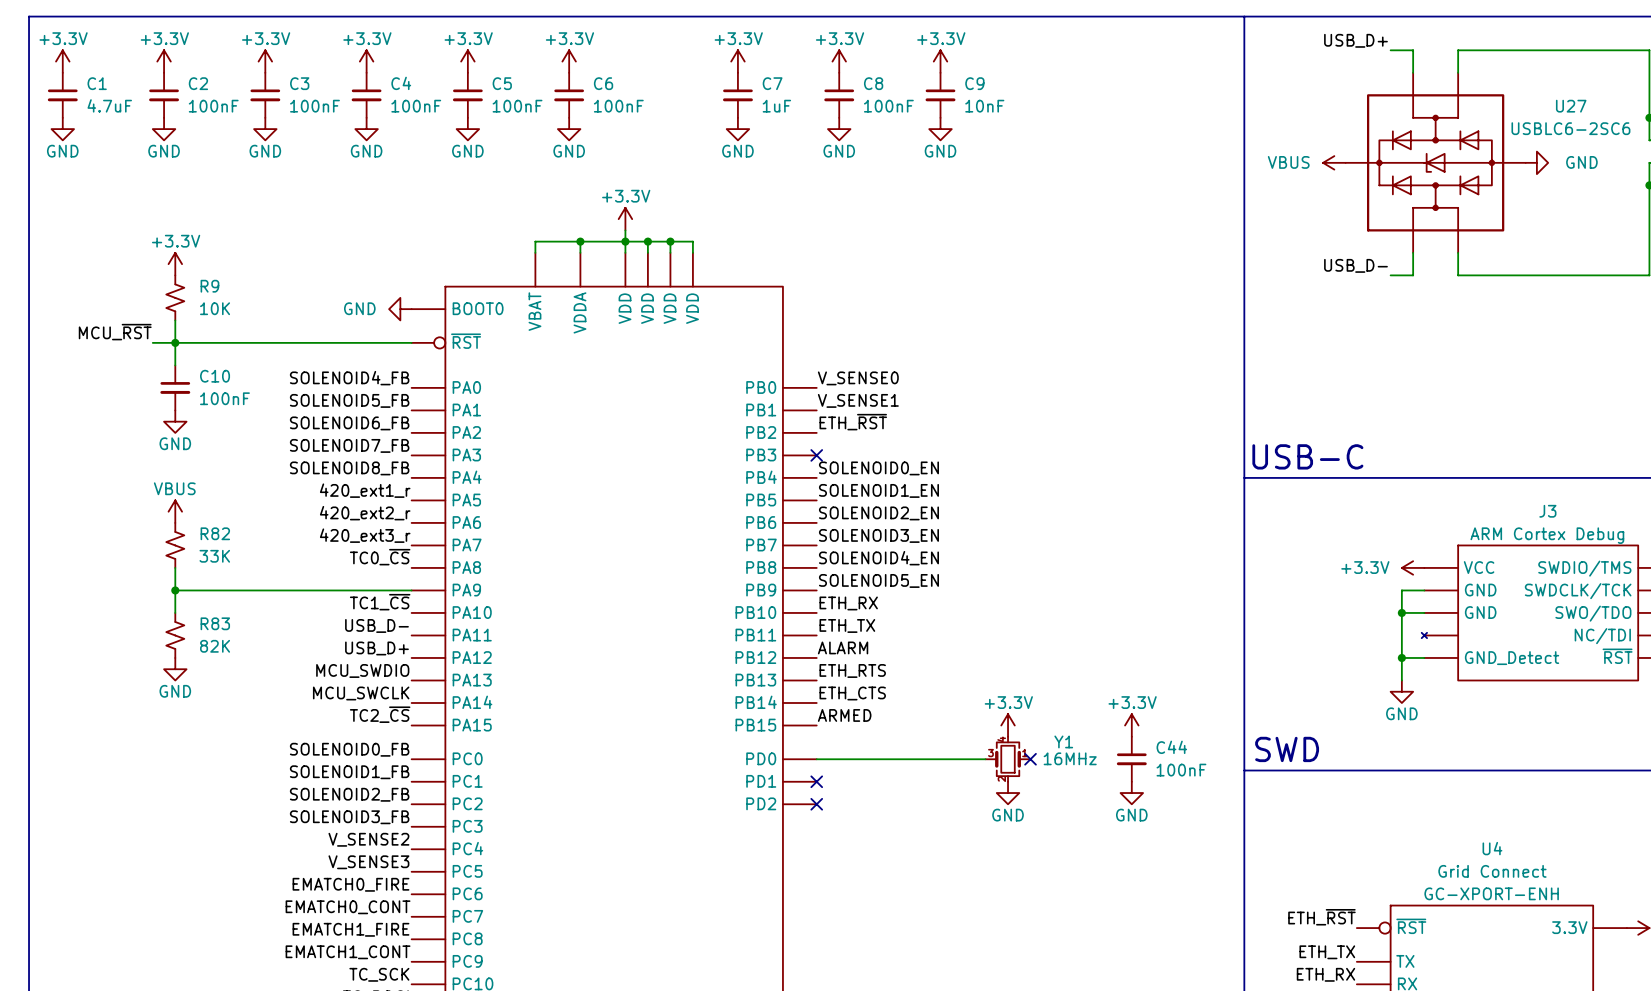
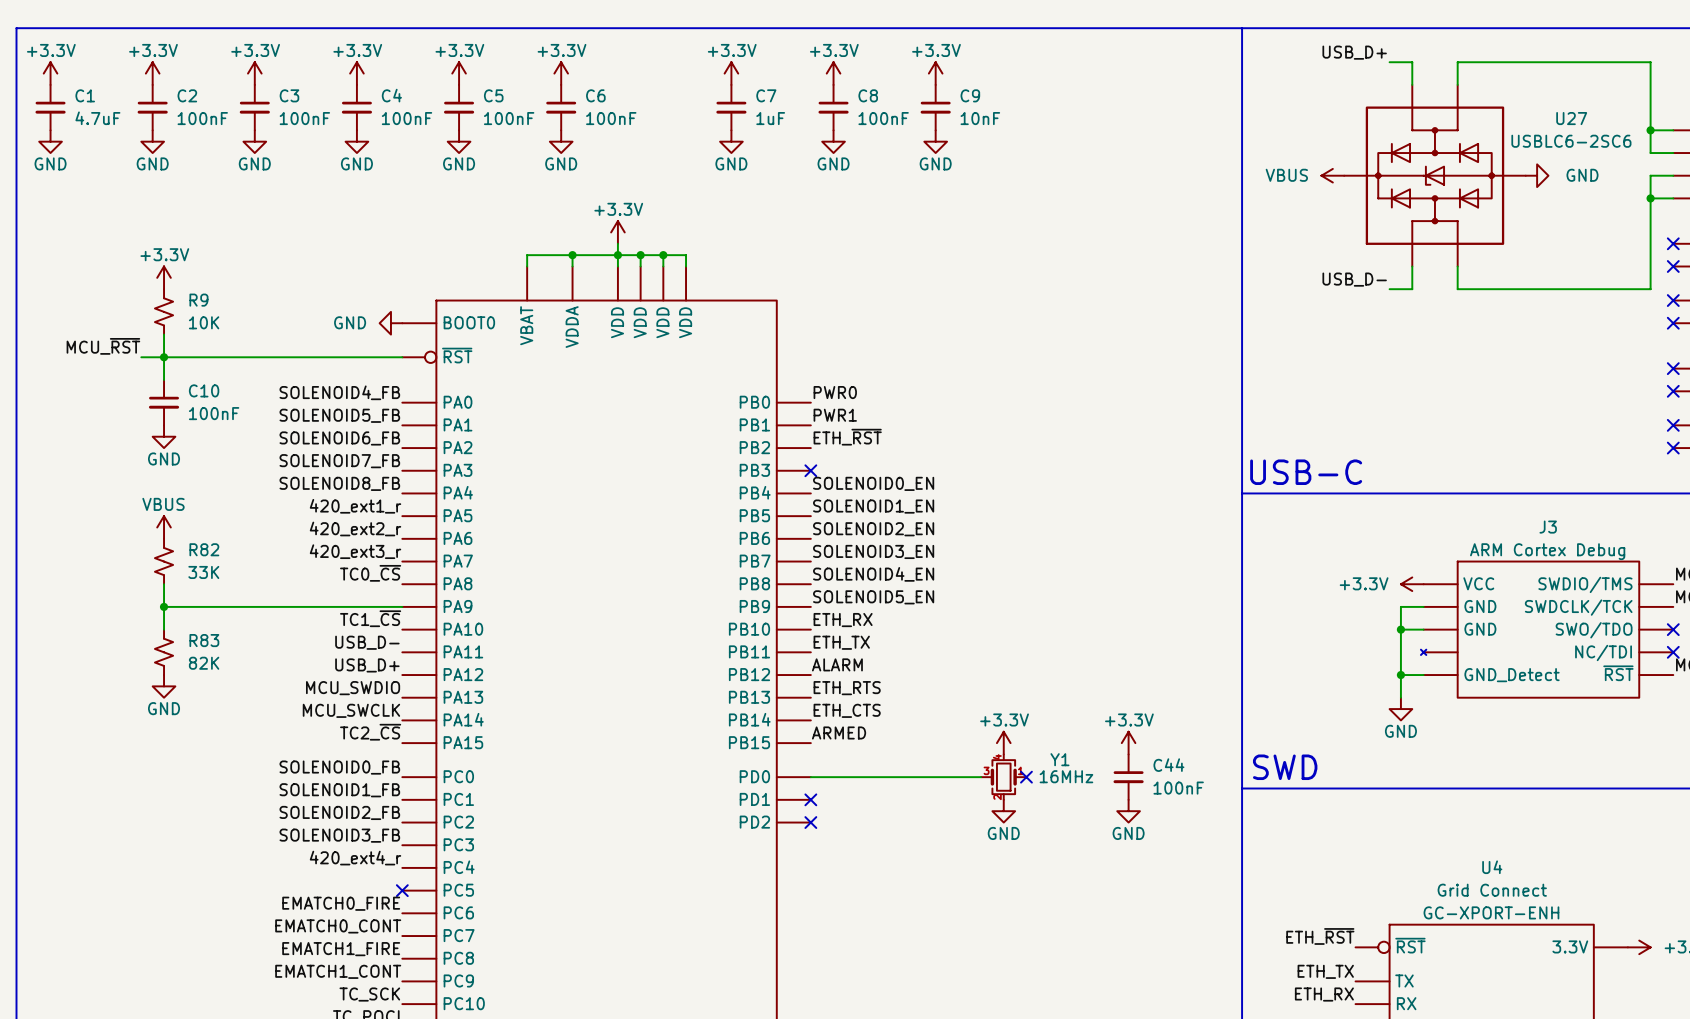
label: V_SENSE0 (858, 378) -> PWR0 (835, 392)
label: V_SENSE1 (858, 400) -> PWR1 (835, 415)
label: V_SENSE2 (368, 839) -> 420_ext4_r (355, 858)
label: V_SENSE3 (368, 862) -> none
no-connect mark: none -> (402, 890)

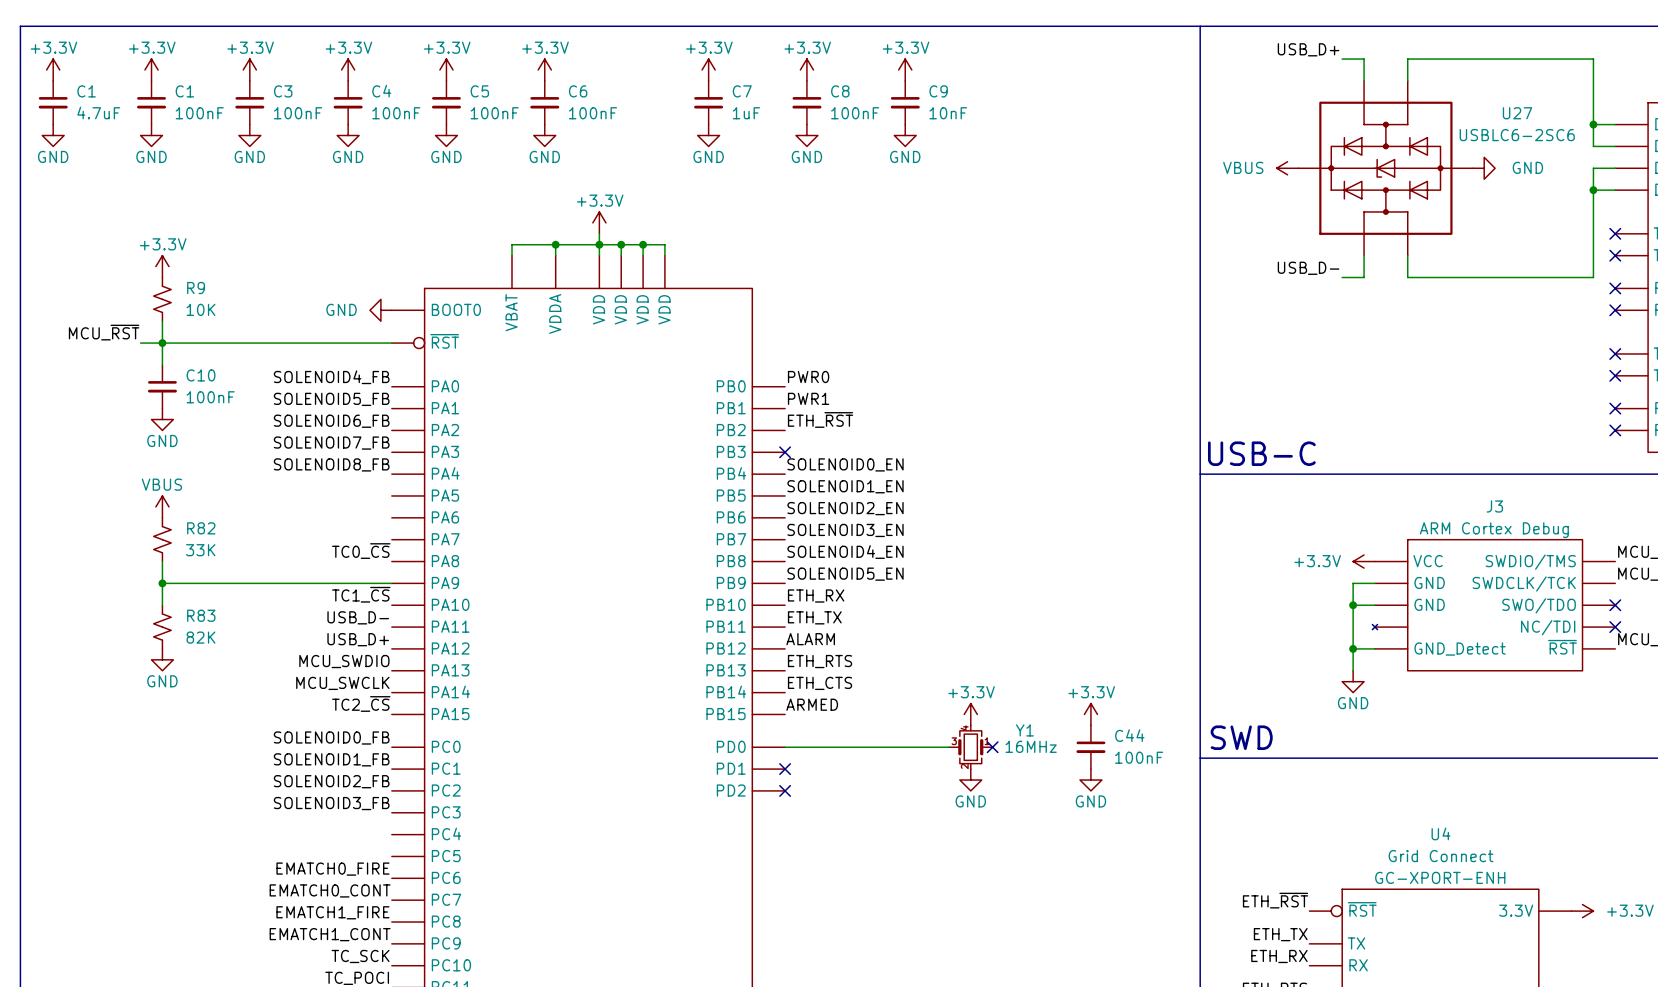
C2 name: C2 (187, 95) -> C1 (184, 91)
label: 420_ext1_r (355, 506) -> none
label: 420_ext2_r (355, 528) -> none
label: 420_ext3_r (355, 551) -> none
label: 420_ext4_r (355, 858) -> none
no-connect mark: (402, 890) -> none

